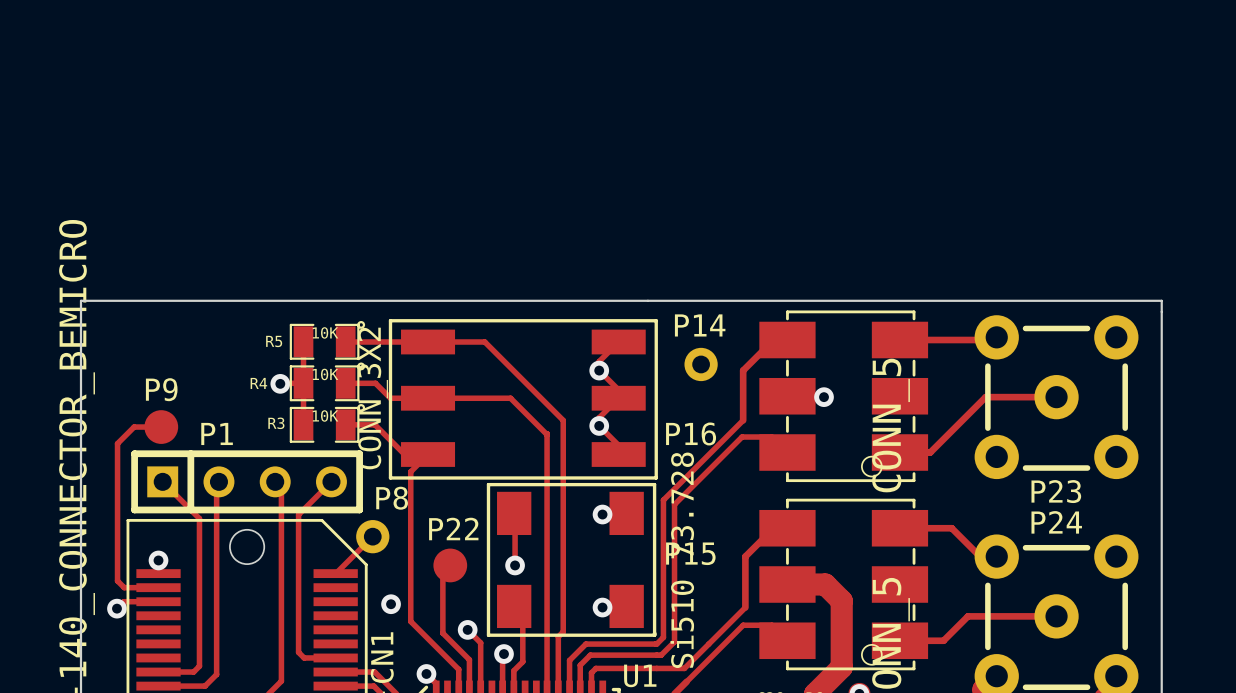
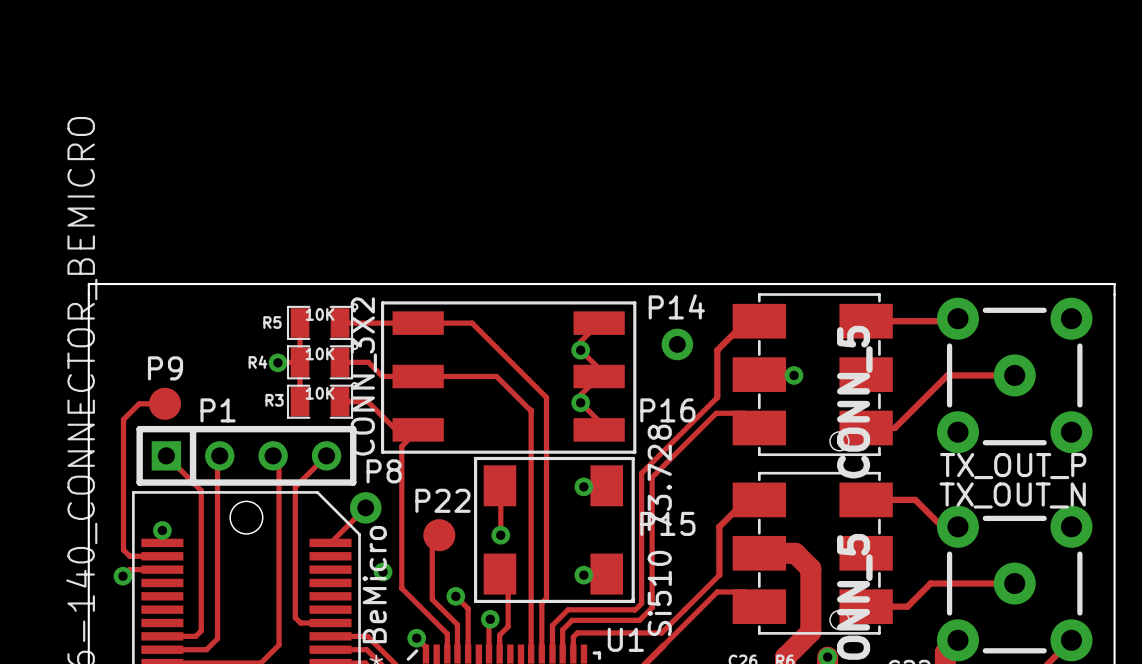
P23 name: P23 (1056, 491) -> TX_OUT_P (1013, 466)
P24 name: P24 (1056, 522) -> TX_OUT_N (1012, 495)
CN1 name: CN1 (382, 657) -> BeMicro (374, 584)

